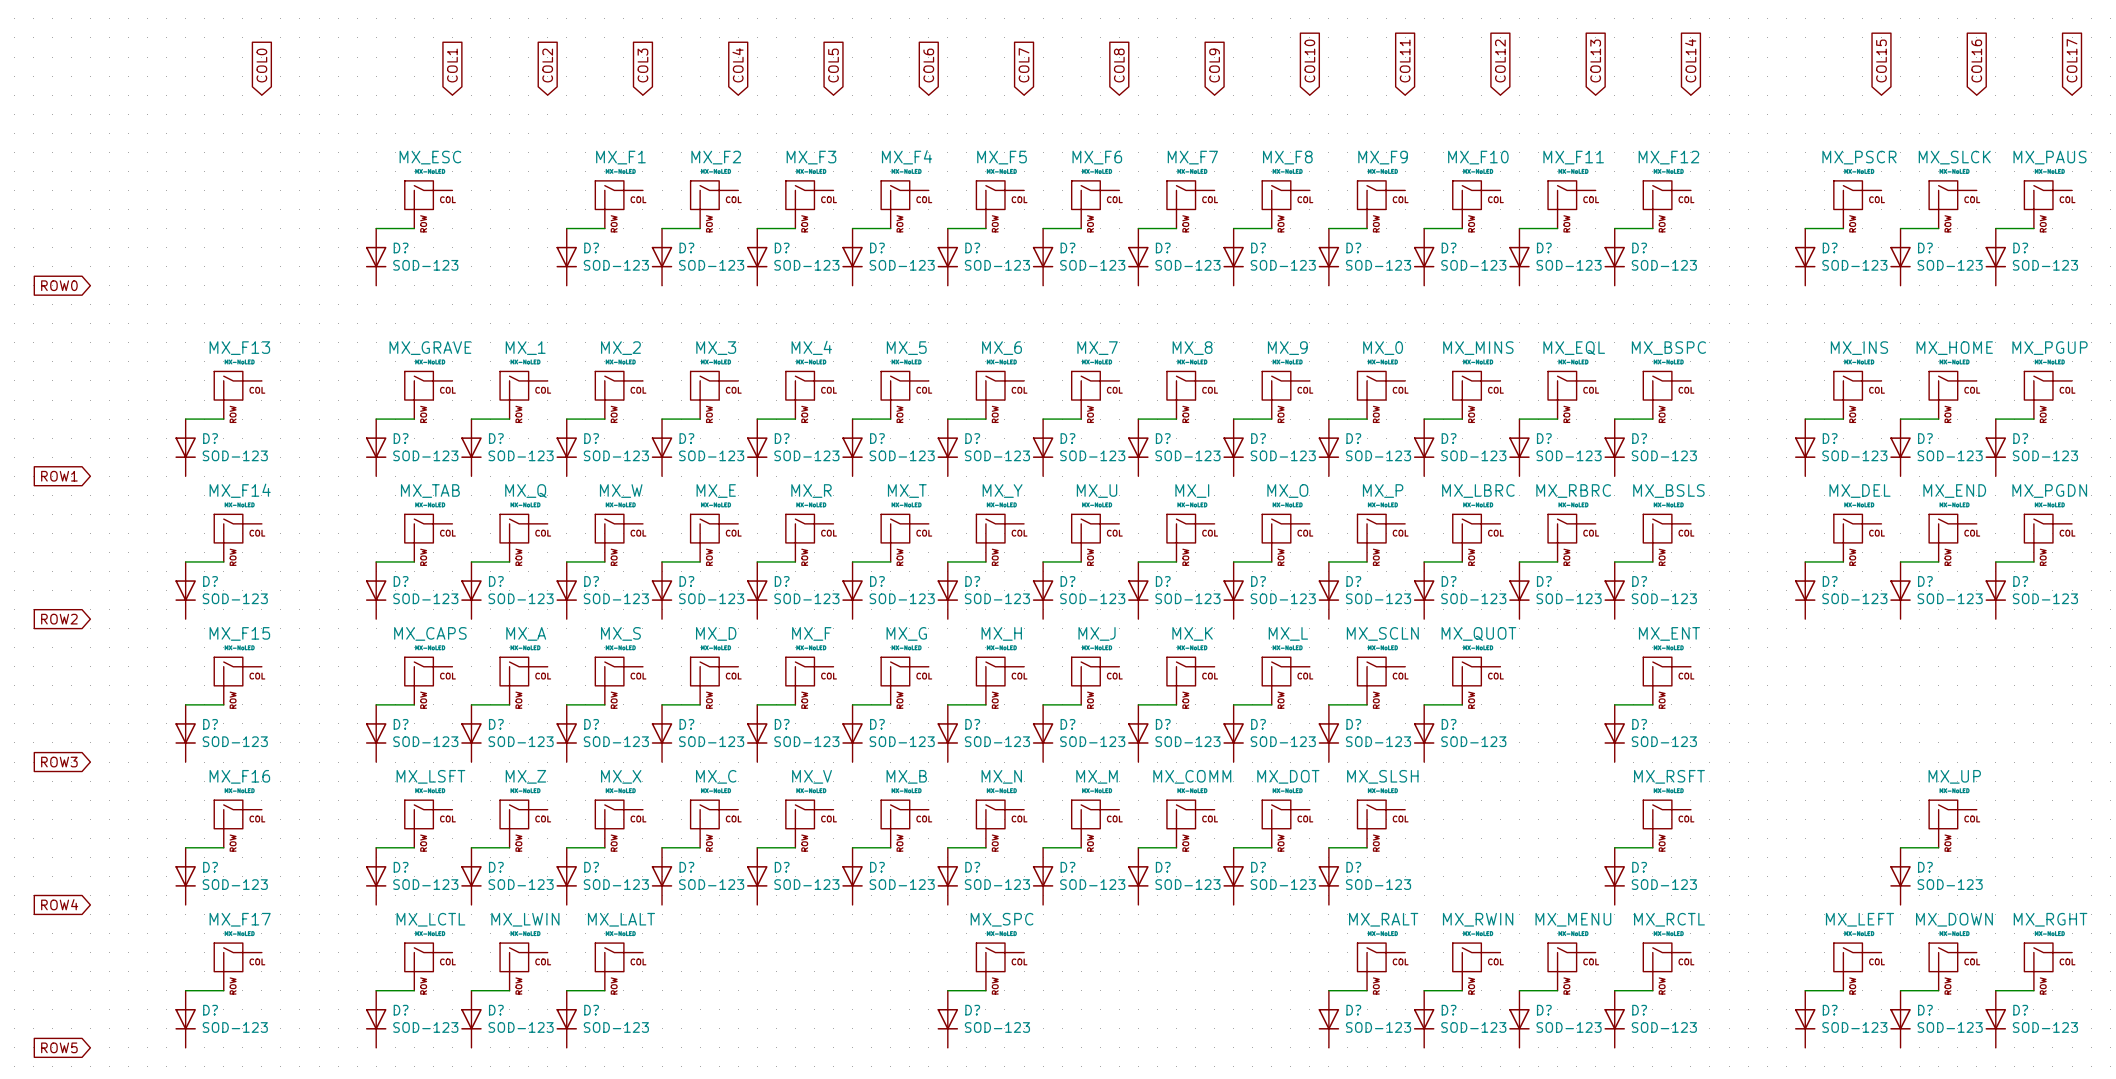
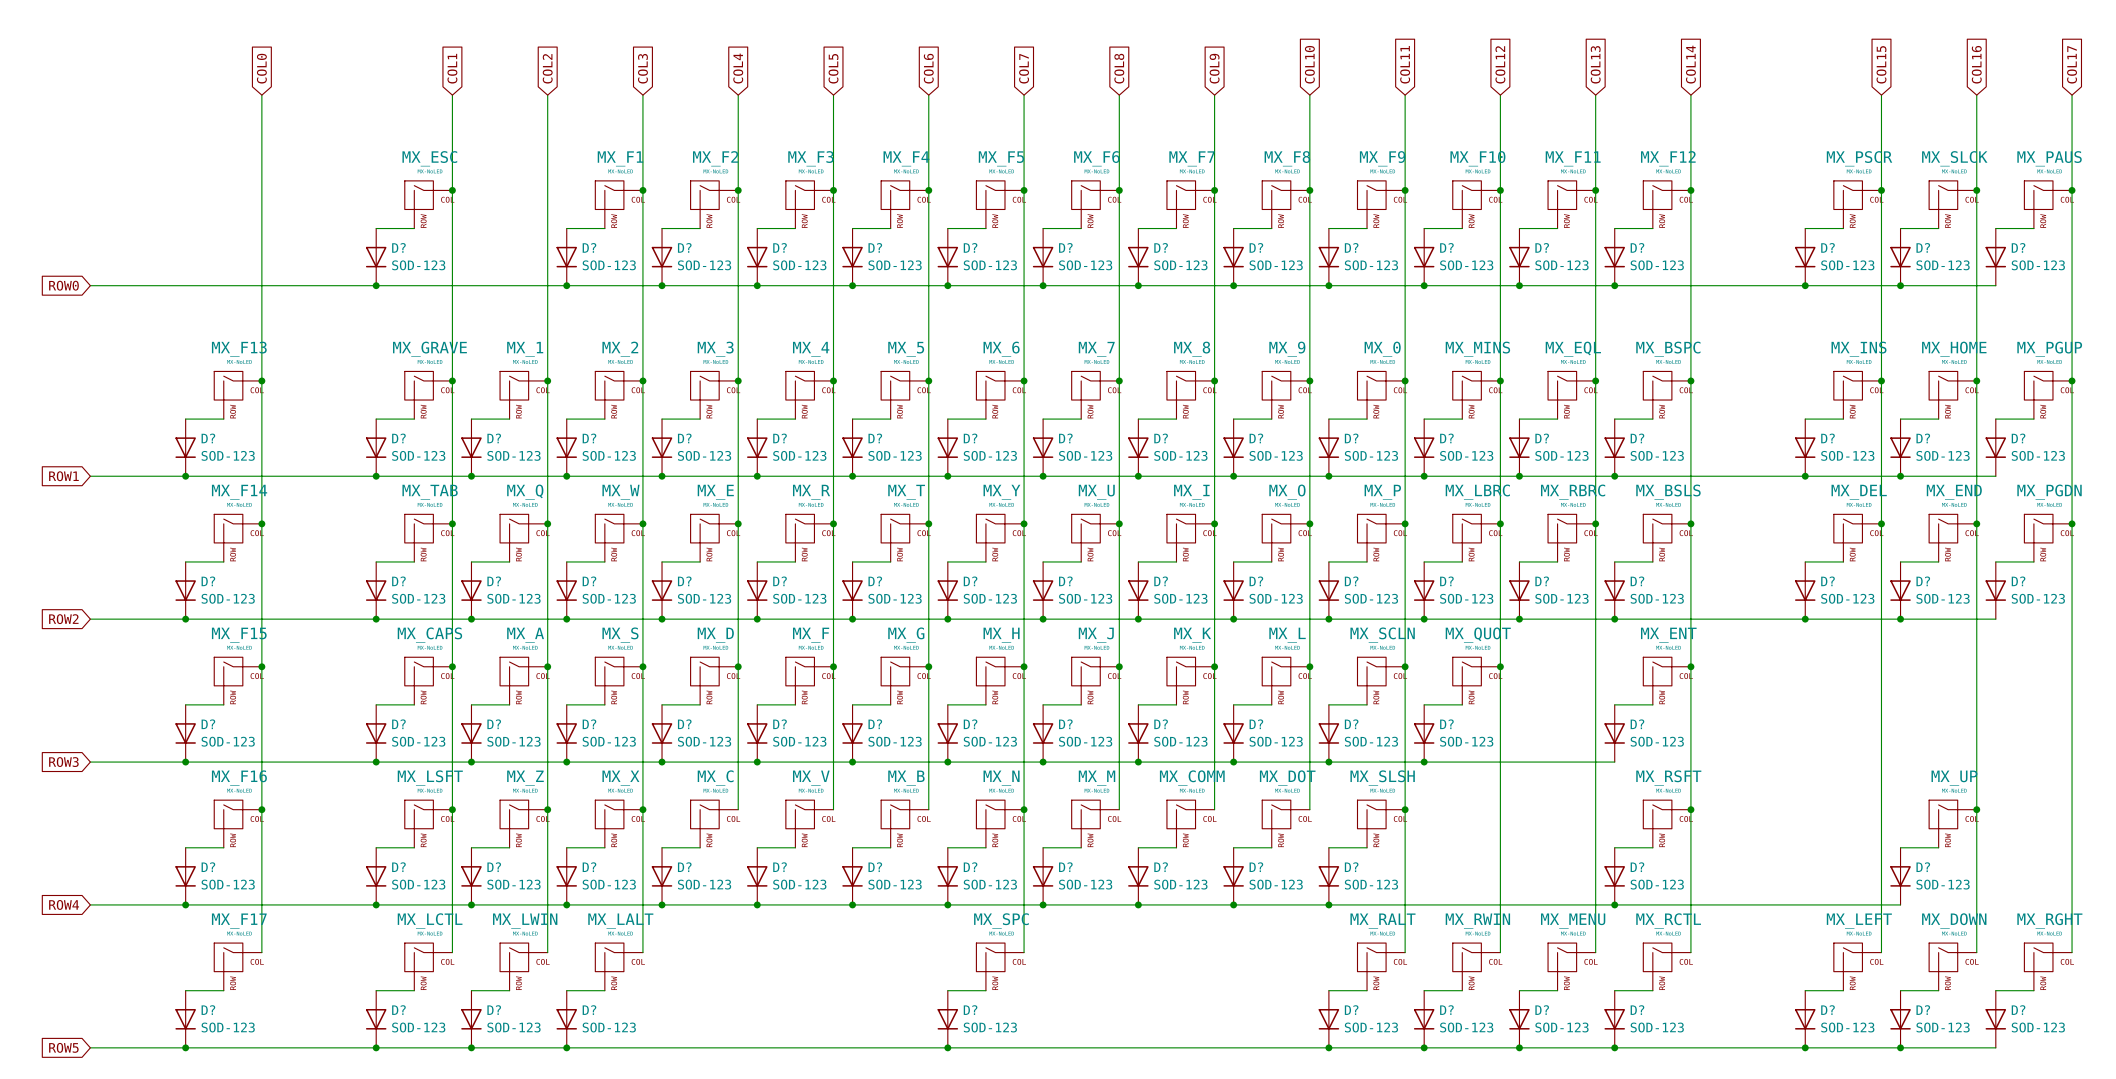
wire: none -> (261, 95) (261, 952)
wire: none -> (452, 95) (452, 952)
wire: none -> (547, 95) (547, 952)
wire: none -> (642, 95) (642, 952)
wire: none -> (738, 95) (738, 809)
wire: none -> (833, 95) (833, 809)
wire: none -> (928, 95) (928, 809)
wire: none -> (1024, 95) (1024, 952)
wire: none -> (1119, 95) (1119, 809)
wire: none -> (1214, 95) (1214, 809)
wire: none -> (1309, 95) (1309, 809)
wire: none -> (1405, 95) (1405, 952)
wire: none -> (1500, 95) (1500, 952)
wire: none -> (1595, 95) (1595, 952)
wire: none -> (1690, 95) (1690, 952)
wire: none -> (1881, 95) (1881, 952)
wire: none -> (1976, 95) (1976, 952)
wire: none -> (2072, 95) (2072, 952)
junction: none -> (452, 190)
junction: none -> (642, 190)
junction: none -> (738, 190)
junction: none -> (833, 190)
junction: none -> (928, 190)
junction: none -> (1024, 190)
junction: none -> (1119, 190)
junction: none -> (1214, 190)
junction: none -> (1309, 190)
junction: none -> (1405, 190)
junction: none -> (1500, 190)
junction: none -> (1595, 190)
junction: none -> (1690, 190)
junction: none -> (1881, 190)
junction: none -> (1976, 190)
junction: none -> (2072, 190)
wire: none -> (90, 285) (1995, 285)
junction: none -> (376, 285)
junction: none -> (566, 285)
junction: none -> (662, 285)
junction: none -> (757, 285)
junction: none -> (852, 285)
junction: none -> (947, 285)
junction: none -> (1043, 285)
junction: none -> (1138, 285)
junction: none -> (1233, 285)
junction: none -> (1328, 285)
junction: none -> (1424, 285)
junction: none -> (1519, 285)
junction: none -> (1614, 285)
junction: none -> (1805, 285)
junction: none -> (1900, 285)
junction: none -> (261, 380)
junction: none -> (452, 380)
junction: none -> (547, 380)
junction: none -> (642, 380)
junction: none -> (738, 380)
junction: none -> (833, 380)
junction: none -> (928, 380)
junction: none -> (1024, 380)
junction: none -> (1119, 380)
junction: none -> (1214, 380)
junction: none -> (1309, 380)
junction: none -> (1405, 380)
junction: none -> (1500, 380)
junction: none -> (1595, 380)
junction: none -> (1690, 380)
junction: none -> (1881, 380)
junction: none -> (1976, 380)
junction: none -> (2072, 380)
wire: none -> (90, 476) (1995, 476)
junction: none -> (185, 476)
junction: none -> (376, 476)
junction: none -> (471, 476)
junction: none -> (566, 476)
junction: none -> (662, 476)
junction: none -> (757, 476)
junction: none -> (852, 476)
junction: none -> (947, 476)
junction: none -> (1043, 476)
junction: none -> (1138, 476)
junction: none -> (1233, 476)
junction: none -> (1328, 476)
junction: none -> (1424, 476)
junction: none -> (1519, 476)
junction: none -> (1614, 476)
junction: none -> (1805, 476)
junction: none -> (1900, 476)
junction: none -> (261, 523)
junction: none -> (452, 523)
junction: none -> (547, 523)
junction: none -> (642, 523)
junction: none -> (738, 523)
junction: none -> (833, 523)
junction: none -> (928, 523)
junction: none -> (1024, 523)
junction: none -> (1119, 523)
junction: none -> (1214, 523)
junction: none -> (1309, 523)
junction: none -> (1405, 523)
junction: none -> (1500, 523)
junction: none -> (1595, 523)
junction: none -> (1690, 523)
junction: none -> (1881, 523)
junction: none -> (1976, 523)
junction: none -> (2072, 523)
wire: none -> (90, 619) (1995, 619)
junction: none -> (185, 619)
junction: none -> (376, 619)
junction: none -> (471, 619)
junction: none -> (566, 619)
junction: none -> (662, 619)
junction: none -> (757, 619)
junction: none -> (852, 619)
junction: none -> (947, 619)
junction: none -> (1043, 619)
junction: none -> (1138, 619)
junction: none -> (1233, 619)
junction: none -> (1328, 619)
junction: none -> (1424, 619)
junction: none -> (1519, 619)
junction: none -> (1614, 619)
junction: none -> (1805, 619)
junction: none -> (1900, 619)
junction: none -> (261, 666)
junction: none -> (452, 666)
junction: none -> (547, 666)
junction: none -> (642, 666)
junction: none -> (738, 666)
junction: none -> (833, 666)
junction: none -> (928, 666)
junction: none -> (1024, 666)
junction: none -> (1119, 666)
junction: none -> (1214, 666)
junction: none -> (1309, 666)
junction: none -> (1405, 666)
junction: none -> (1500, 666)
junction: none -> (1690, 666)
wire: none -> (90, 762) (1614, 762)
junction: none -> (185, 762)
junction: none -> (376, 762)
junction: none -> (471, 762)
junction: none -> (566, 762)
junction: none -> (662, 762)
junction: none -> (757, 762)
junction: none -> (852, 762)
junction: none -> (947, 762)
junction: none -> (1043, 762)
junction: none -> (1138, 762)
junction: none -> (1233, 762)
junction: none -> (1328, 762)
junction: none -> (1424, 762)
junction: none -> (261, 809)
junction: none -> (452, 809)
junction: none -> (547, 809)
junction: none -> (642, 809)
junction: none -> (1024, 809)
junction: none -> (1405, 809)
junction: none -> (1690, 809)
junction: none -> (1976, 809)
wire: none -> (90, 904) (1900, 904)
junction: none -> (185, 904)
junction: none -> (376, 904)
junction: none -> (471, 904)
junction: none -> (566, 904)
junction: none -> (662, 904)
junction: none -> (757, 904)
junction: none -> (852, 904)
junction: none -> (947, 904)
junction: none -> (1043, 904)
junction: none -> (1138, 904)
junction: none -> (1233, 904)
junction: none -> (1328, 904)
junction: none -> (1614, 904)
wire: none -> (90, 1047) (1995, 1047)
junction: none -> (185, 1047)
junction: none -> (376, 1047)
junction: none -> (471, 1047)
junction: none -> (566, 1047)
junction: none -> (947, 1047)
junction: none -> (1328, 1047)
junction: none -> (1424, 1047)
junction: none -> (1519, 1047)
junction: none -> (1614, 1047)
junction: none -> (1805, 1047)
junction: none -> (1900, 1047)

